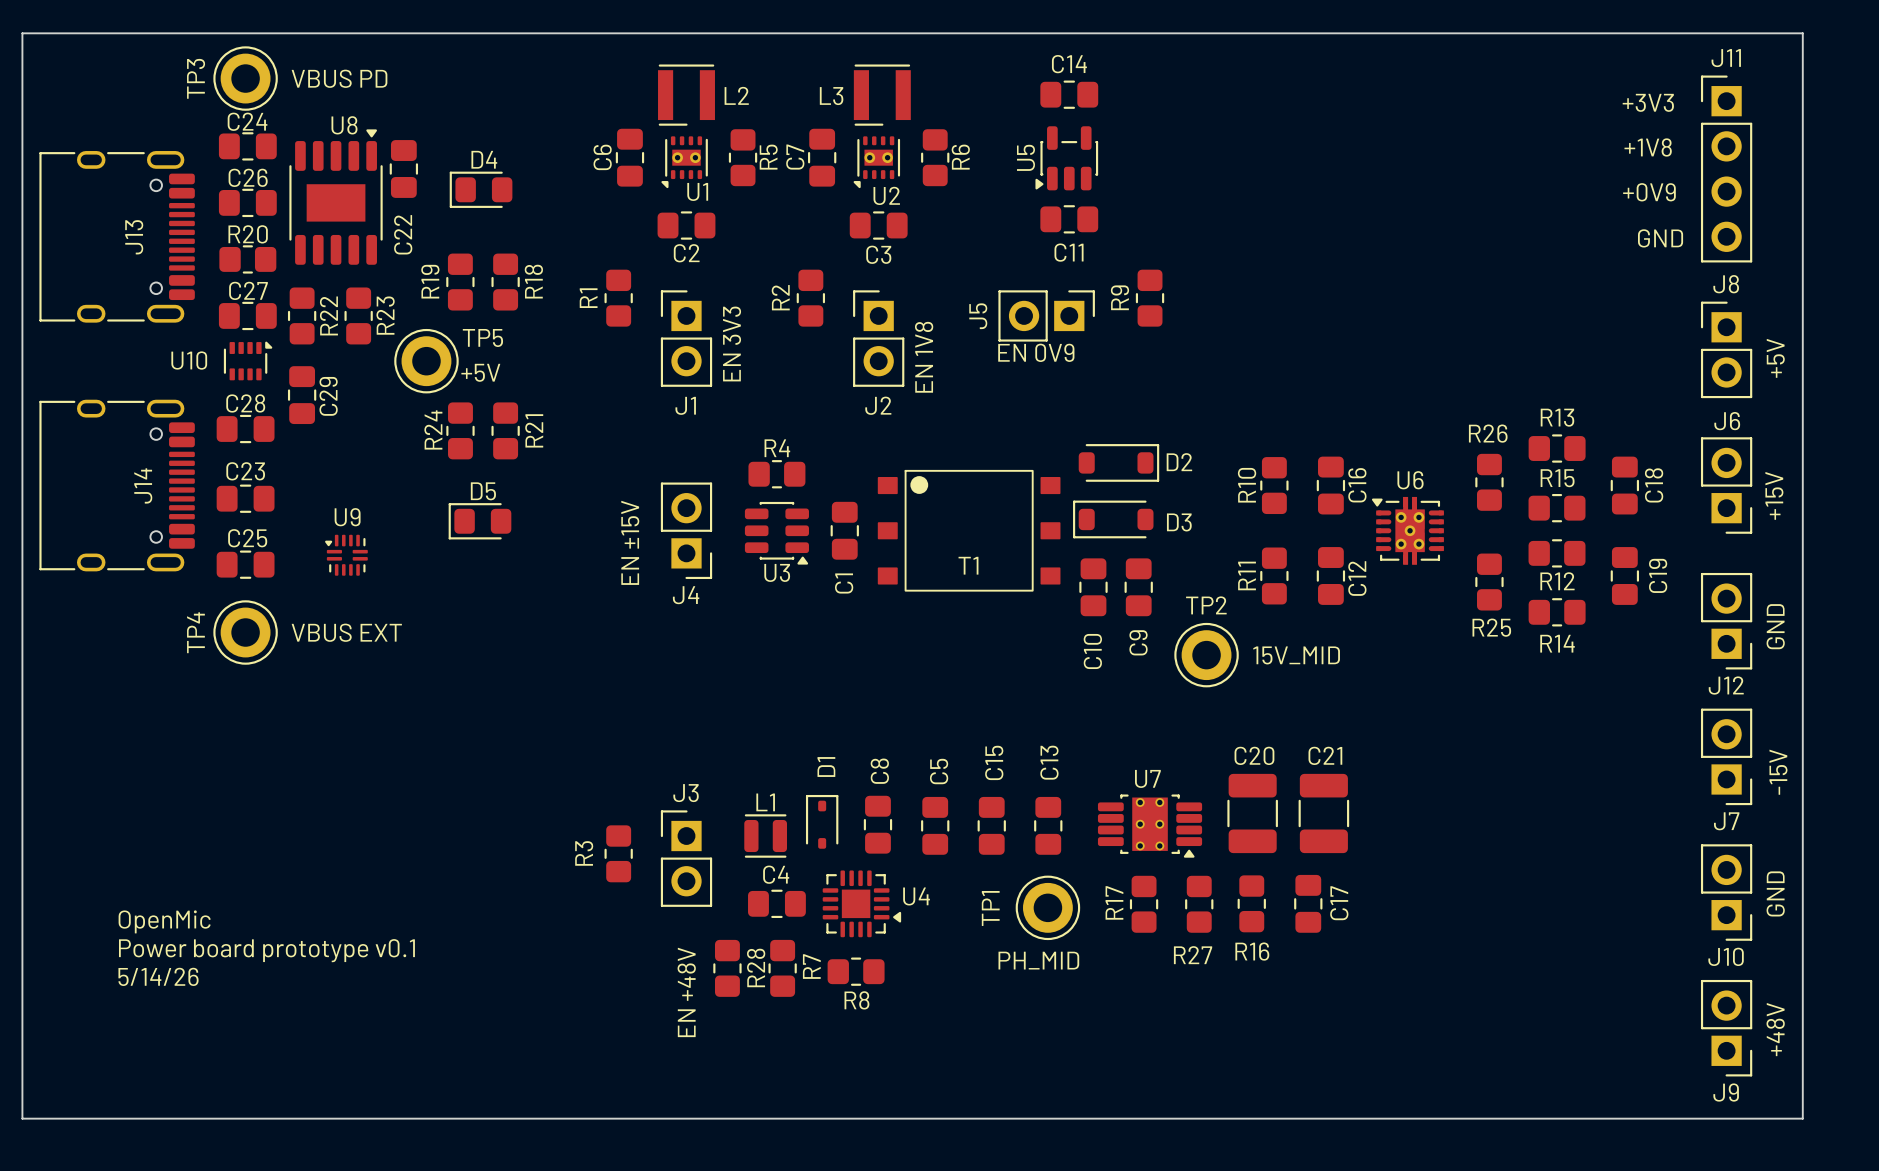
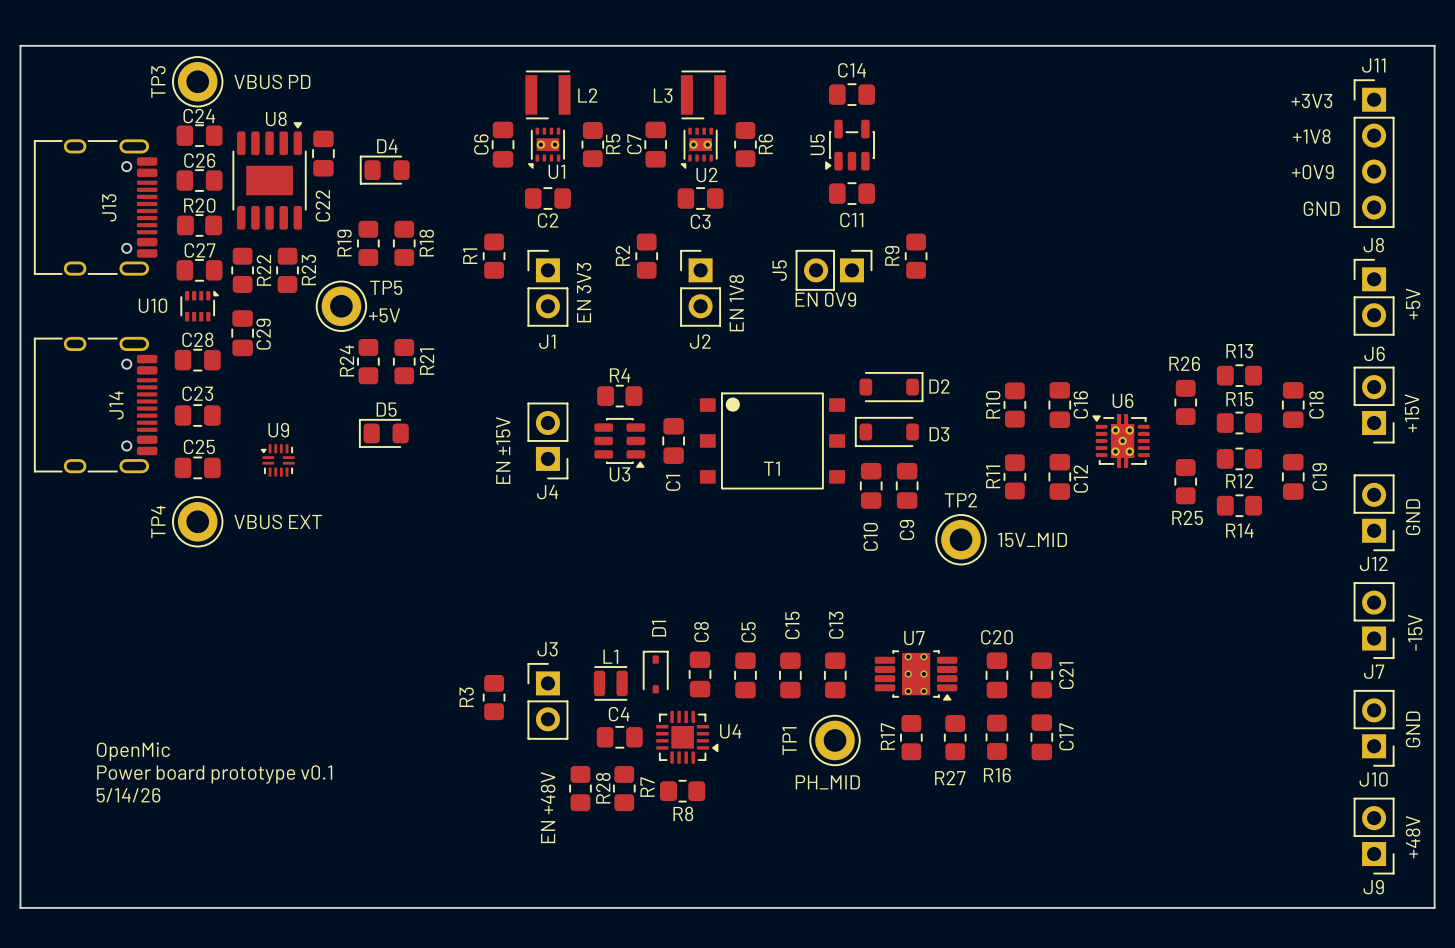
C21 name position: C21 (1325, 755) -> C21 (1066, 675)
C20 footprint: [1227, 773, 1278, 854] -> [985, 652, 1009, 699]
C21 footprint: [1298, 773, 1350, 854] -> [1030, 652, 1054, 699]

